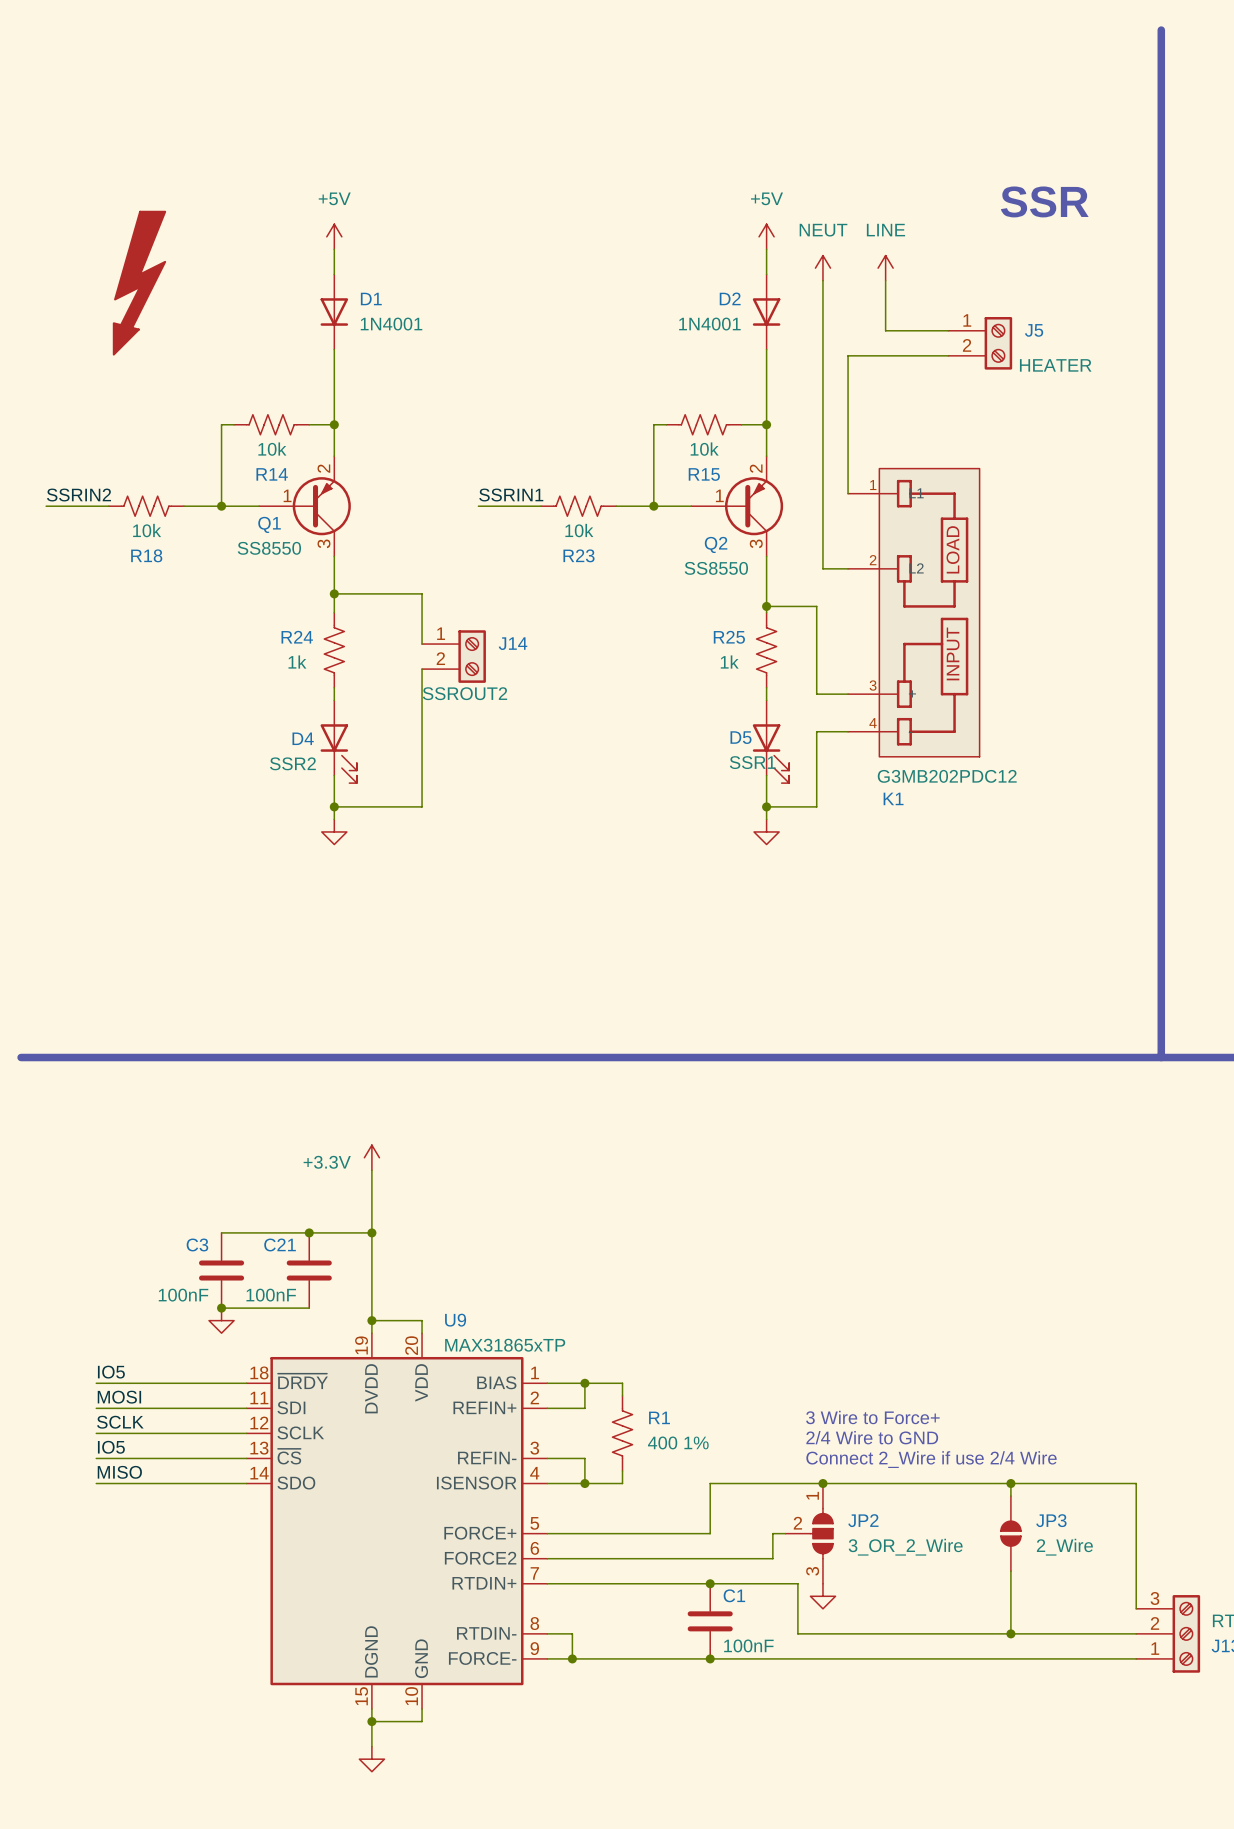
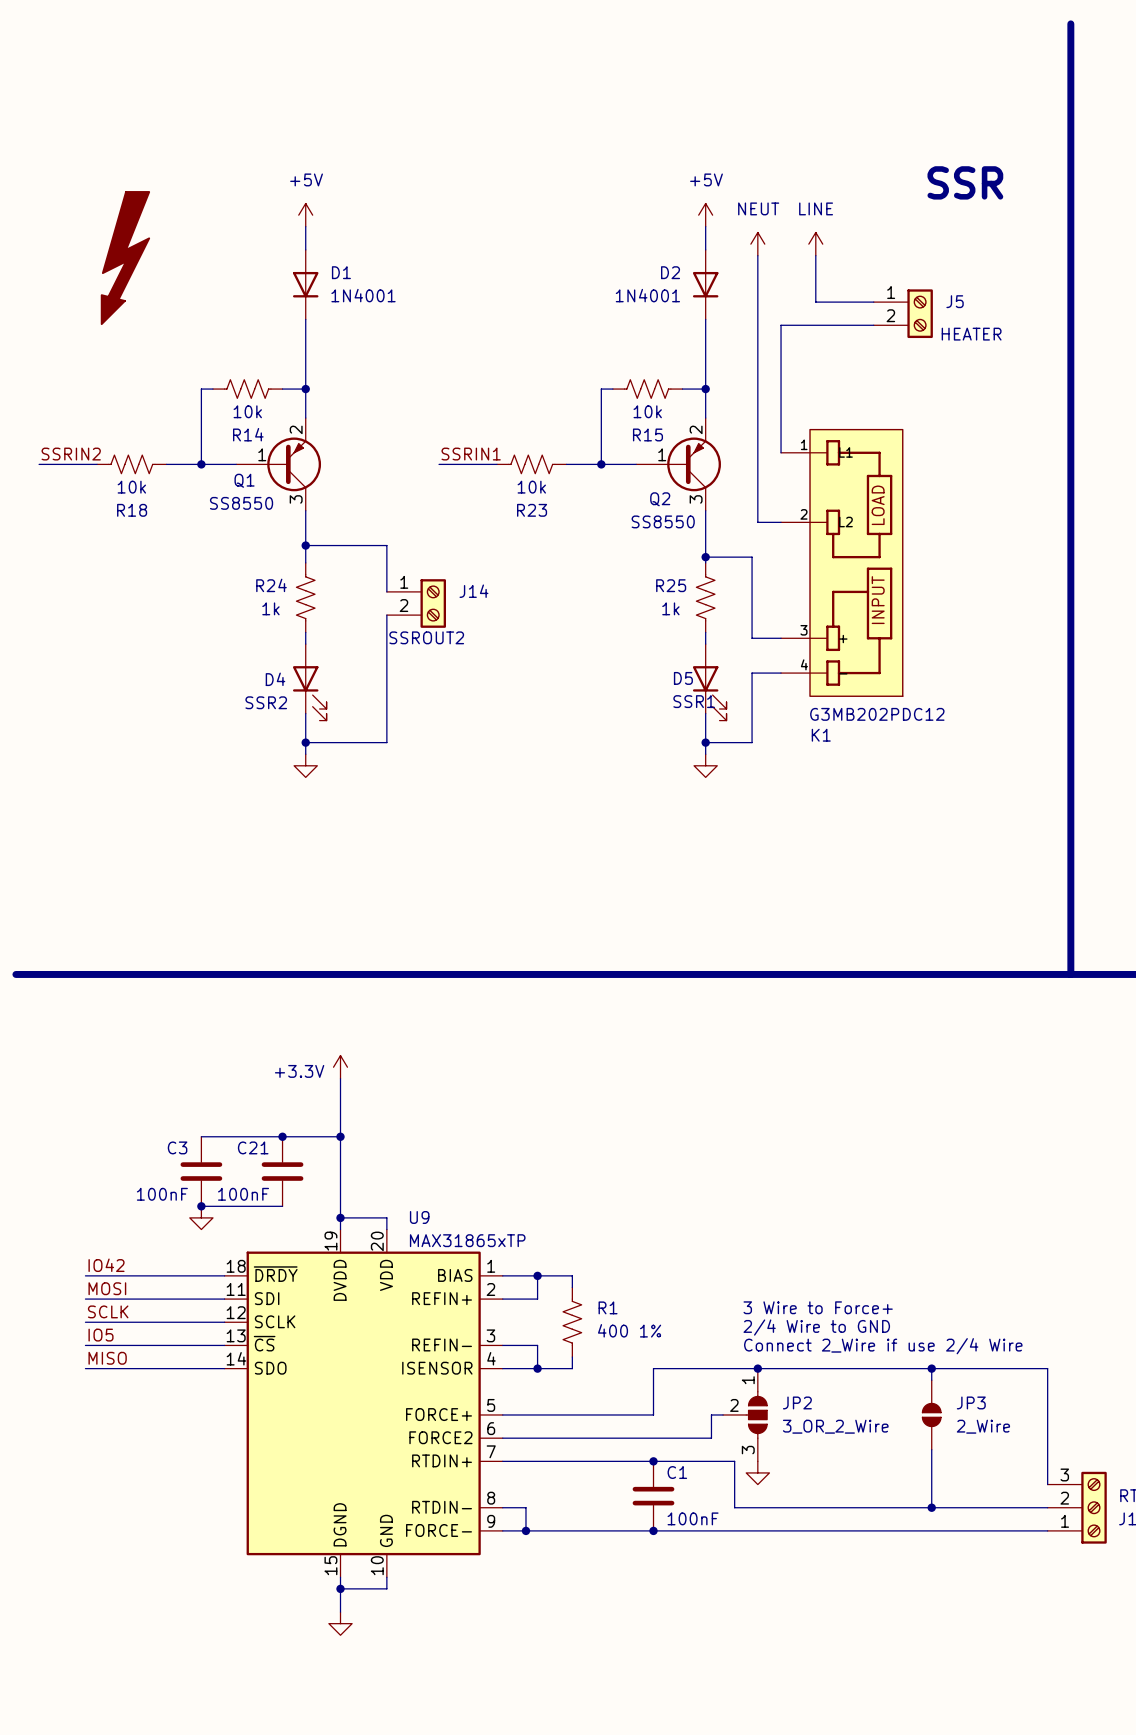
label: IO5 (111, 1372) -> IO42 (106, 1265)

